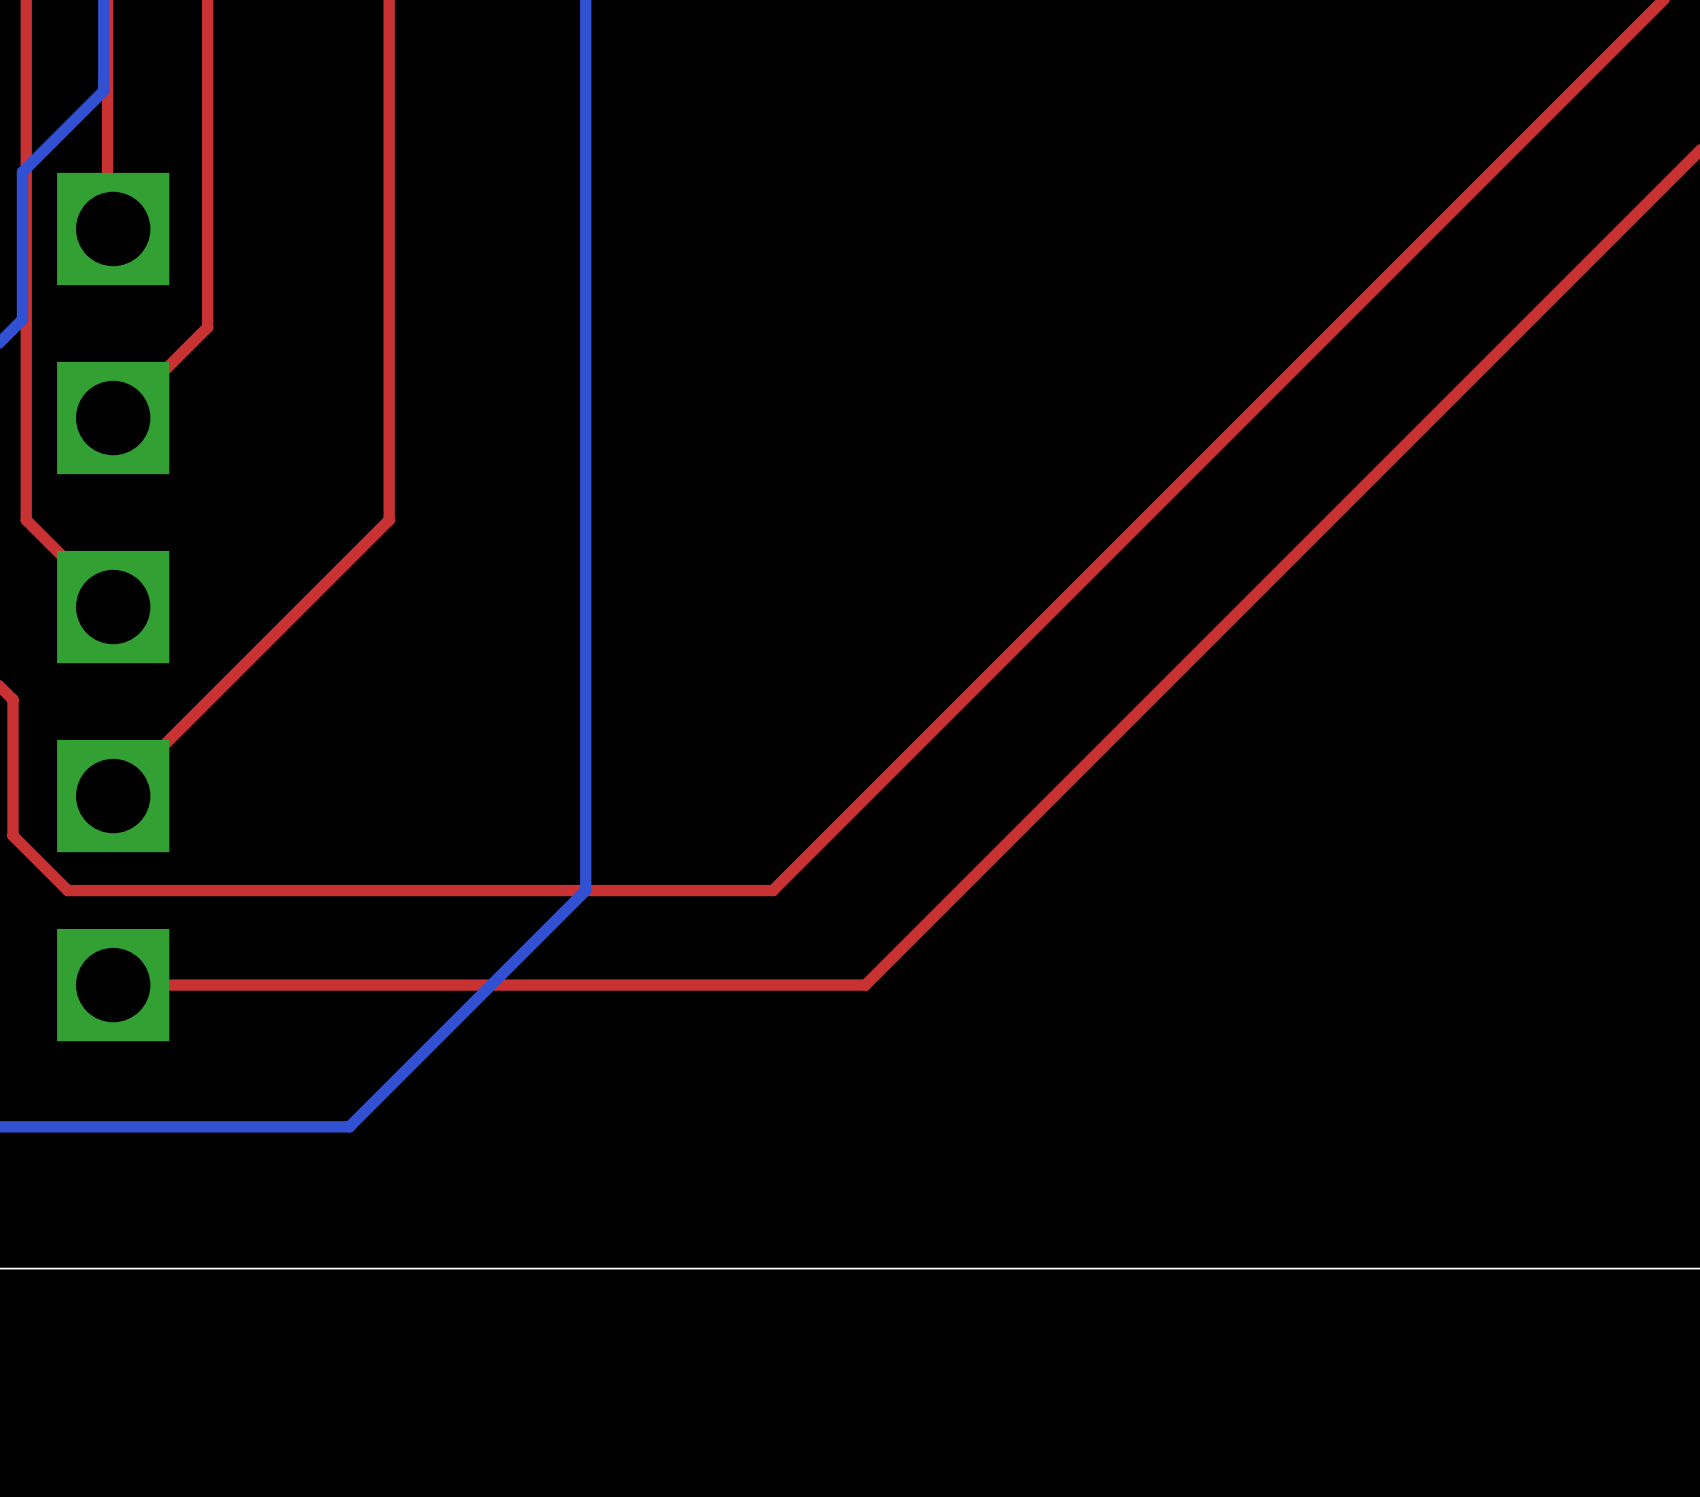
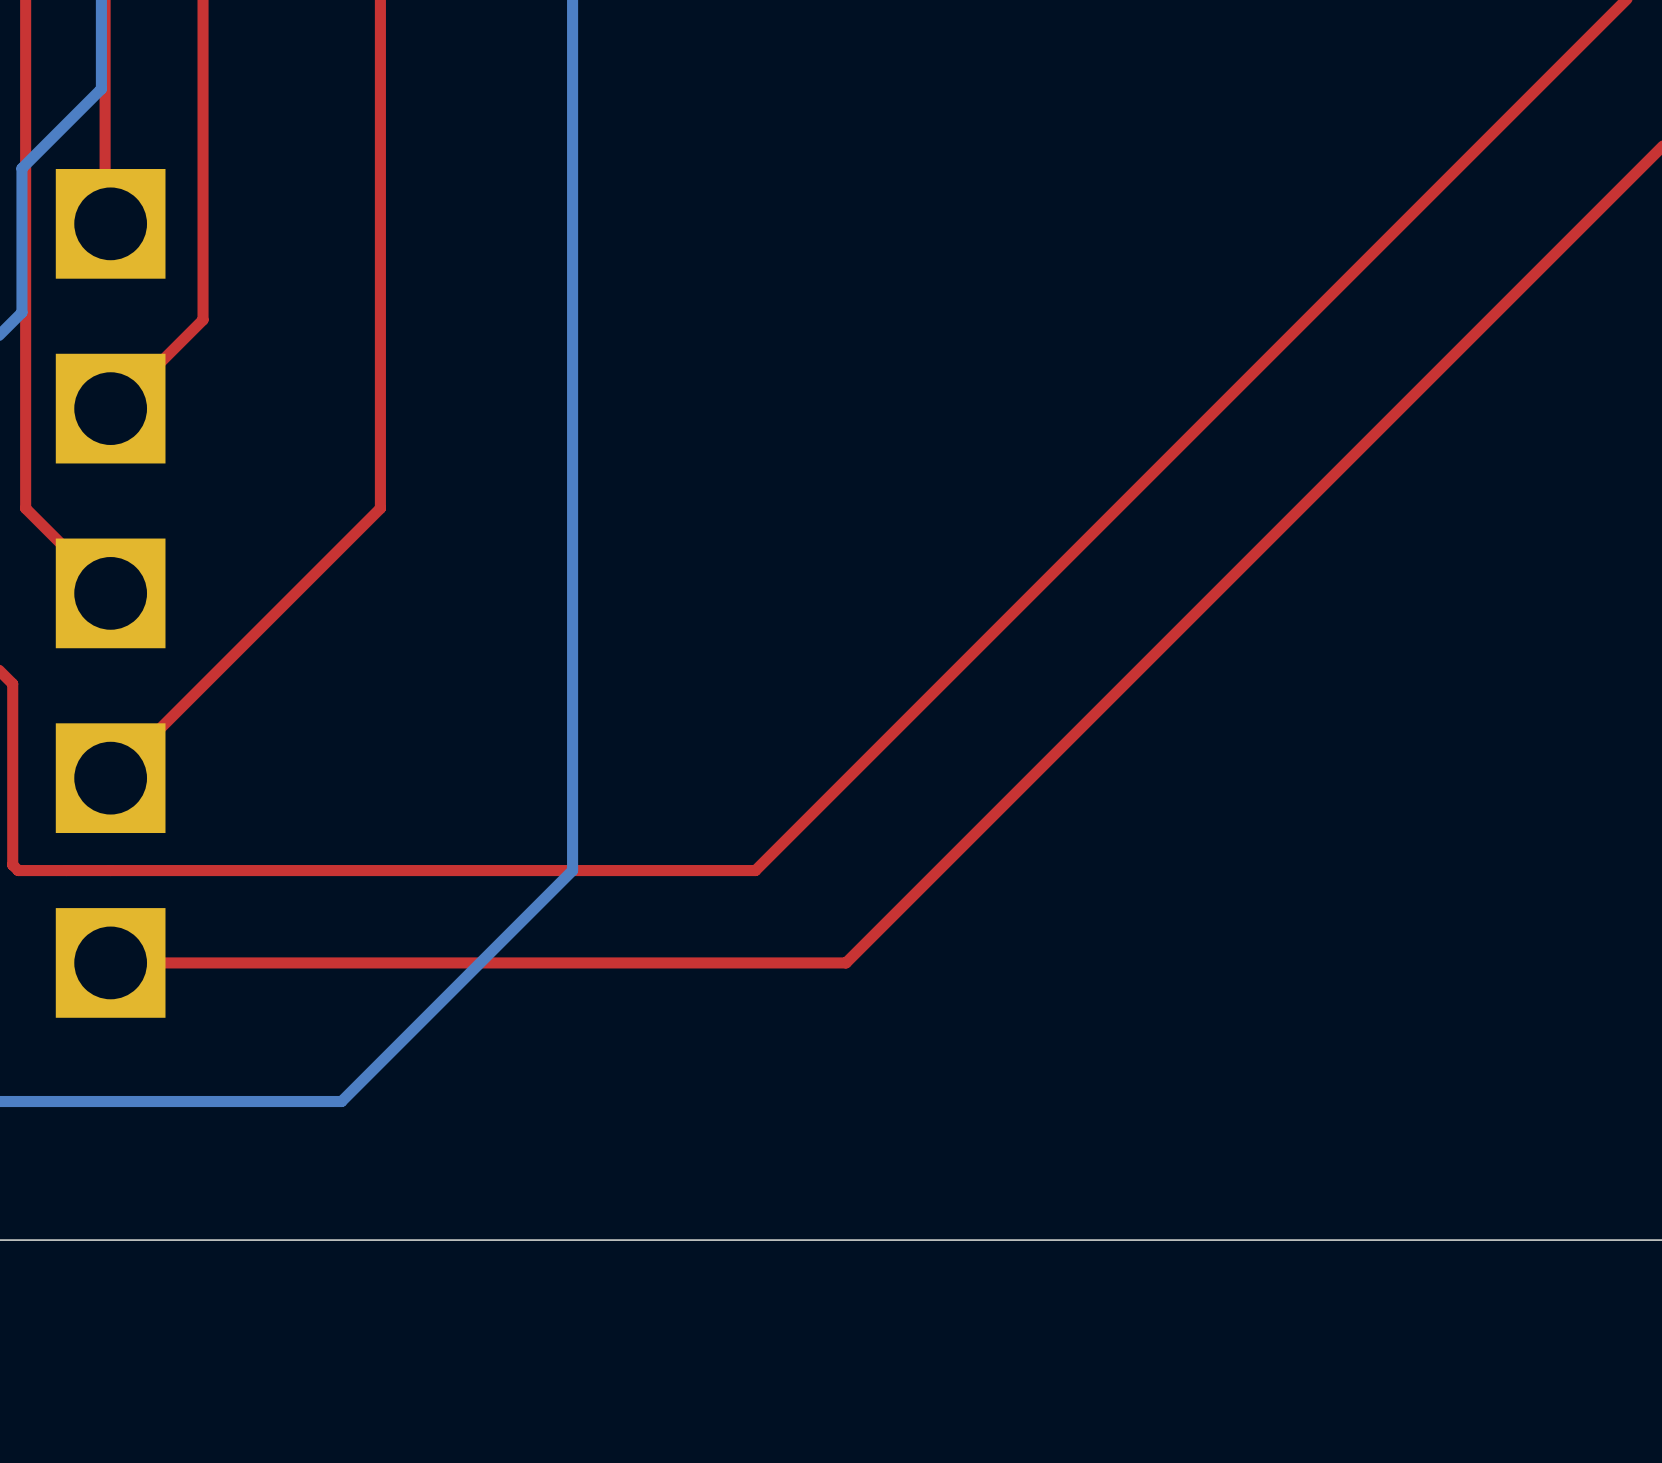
top track: (13, 835) (67, 890) -> (12, 816) (12, 865) (18, 870) (66, 870)

